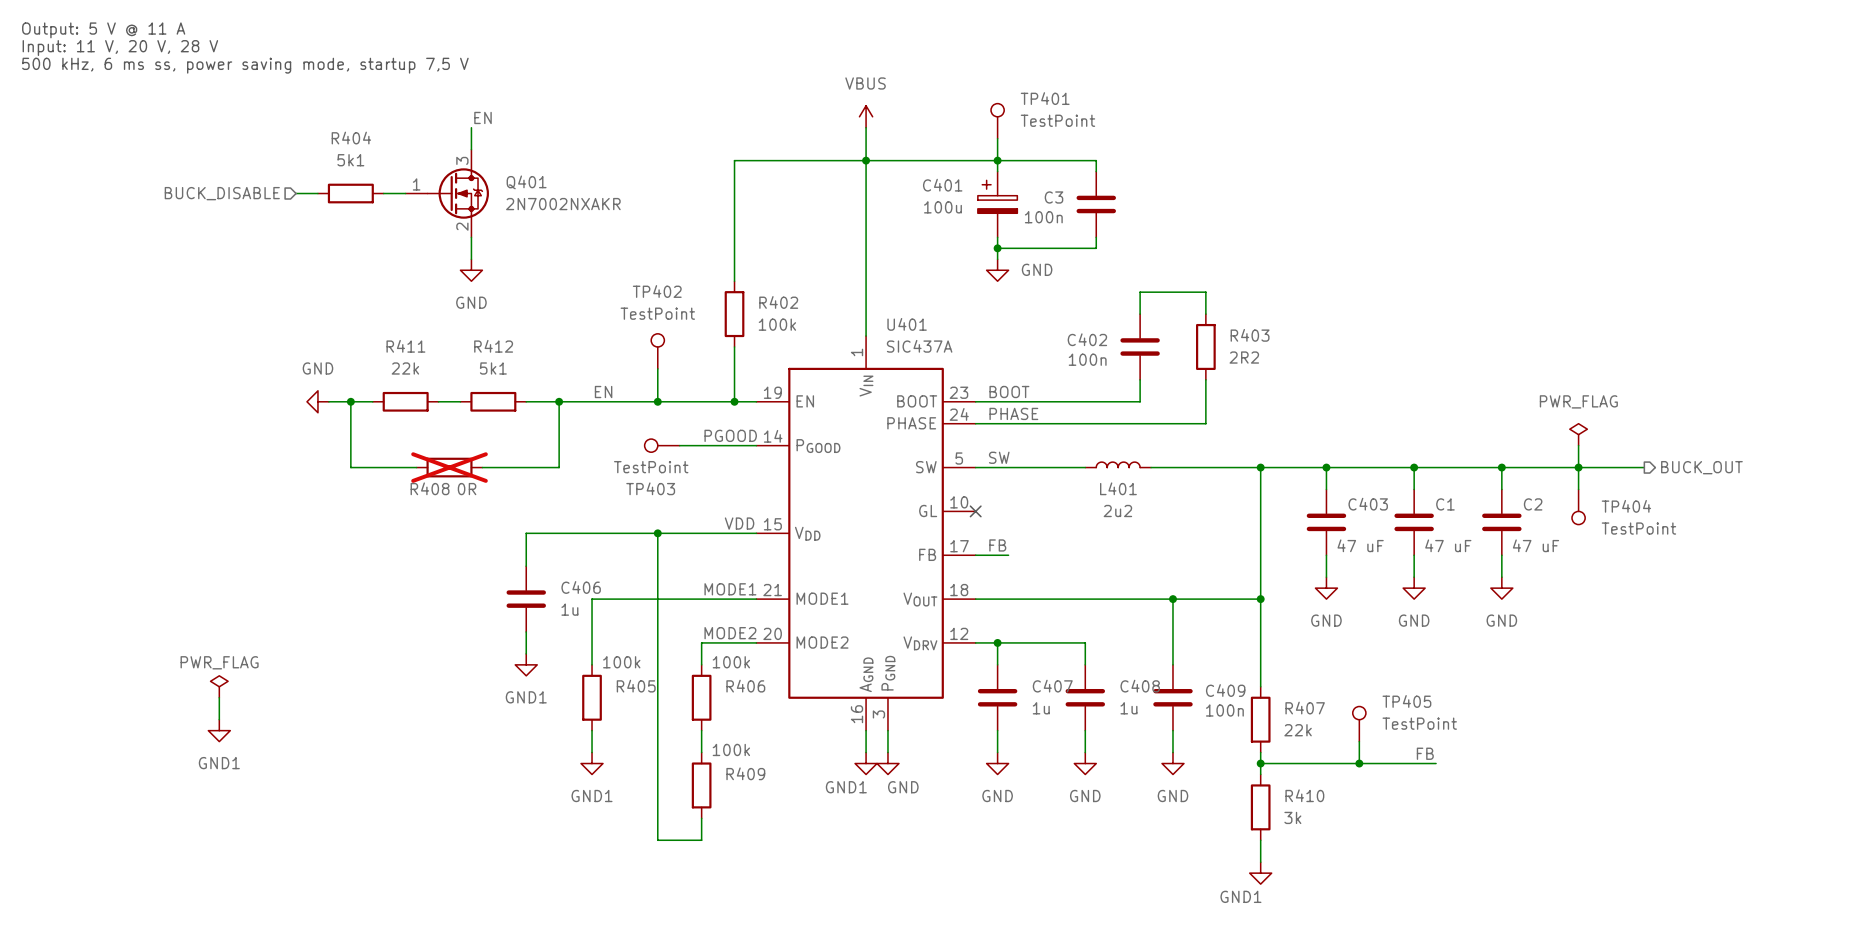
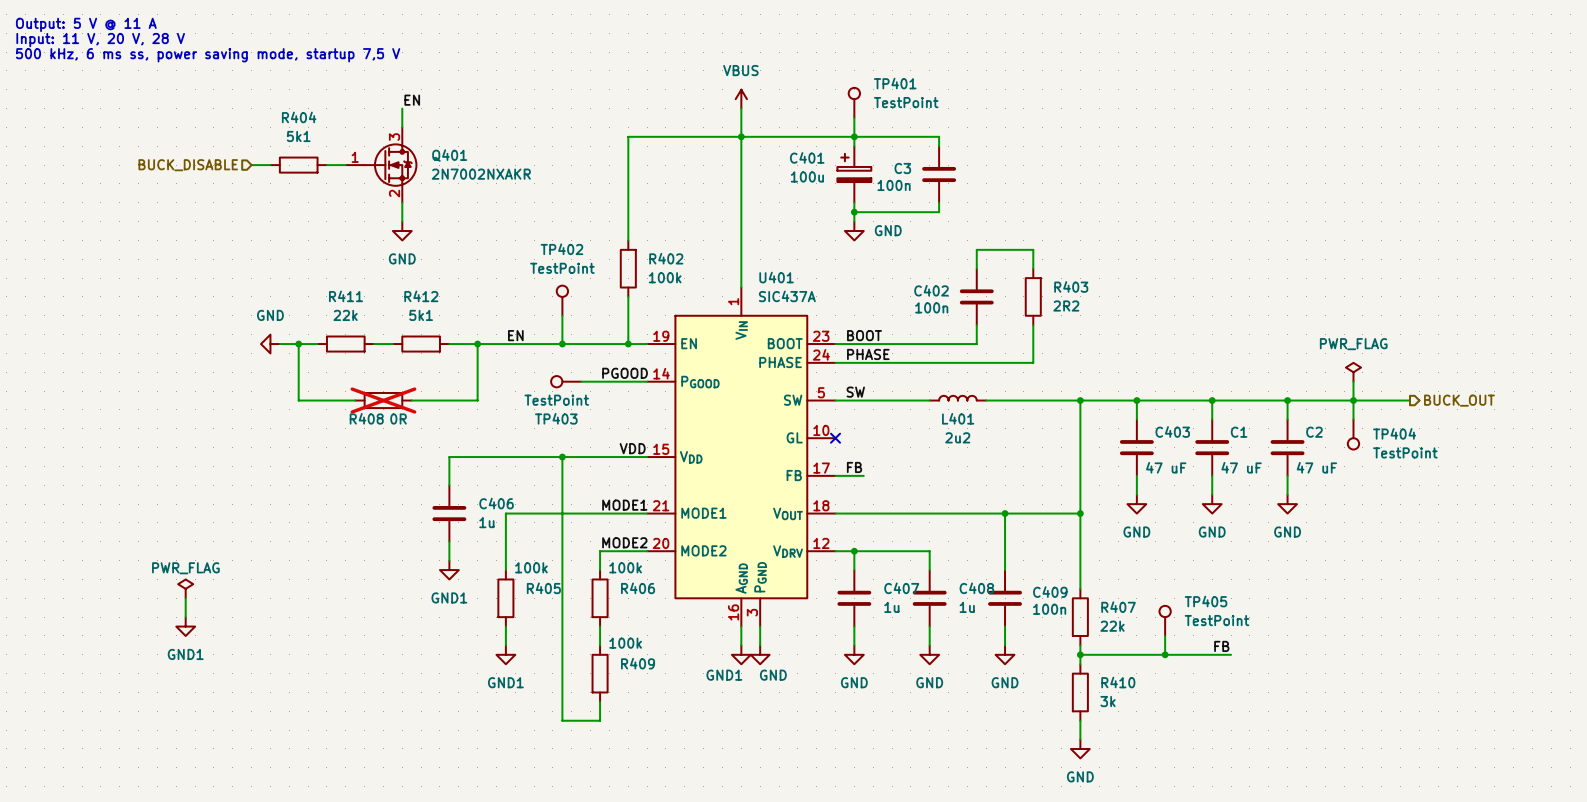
power symbol: GND1 (1260, 873) -> GND (1080, 748)

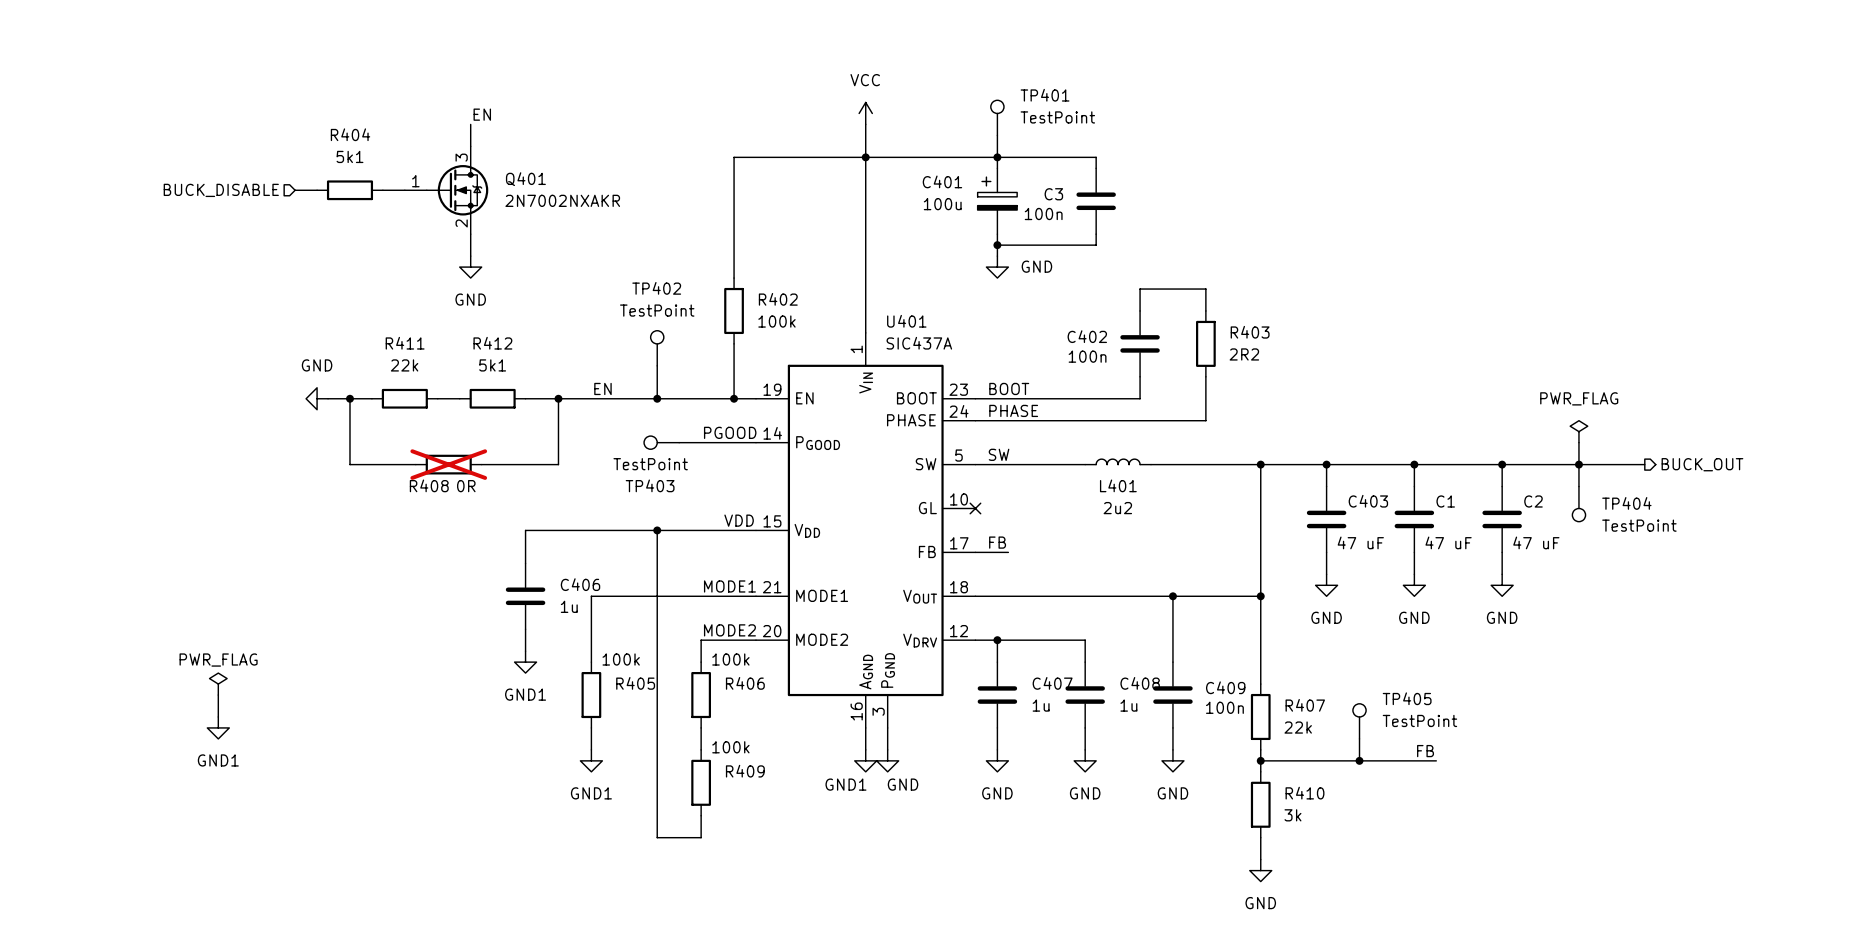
text: Output: 5 V @ 11 A (86, 24) -> none
text: Input: 11 V, 20 V, 28 V (100, 40) -> none
text: 500 kHz, 6 ms ss, power saving mode, startup 7,5 V (208, 55) -> none
power symbol: VBUS (741, 99) -> VCC (865, 113)

